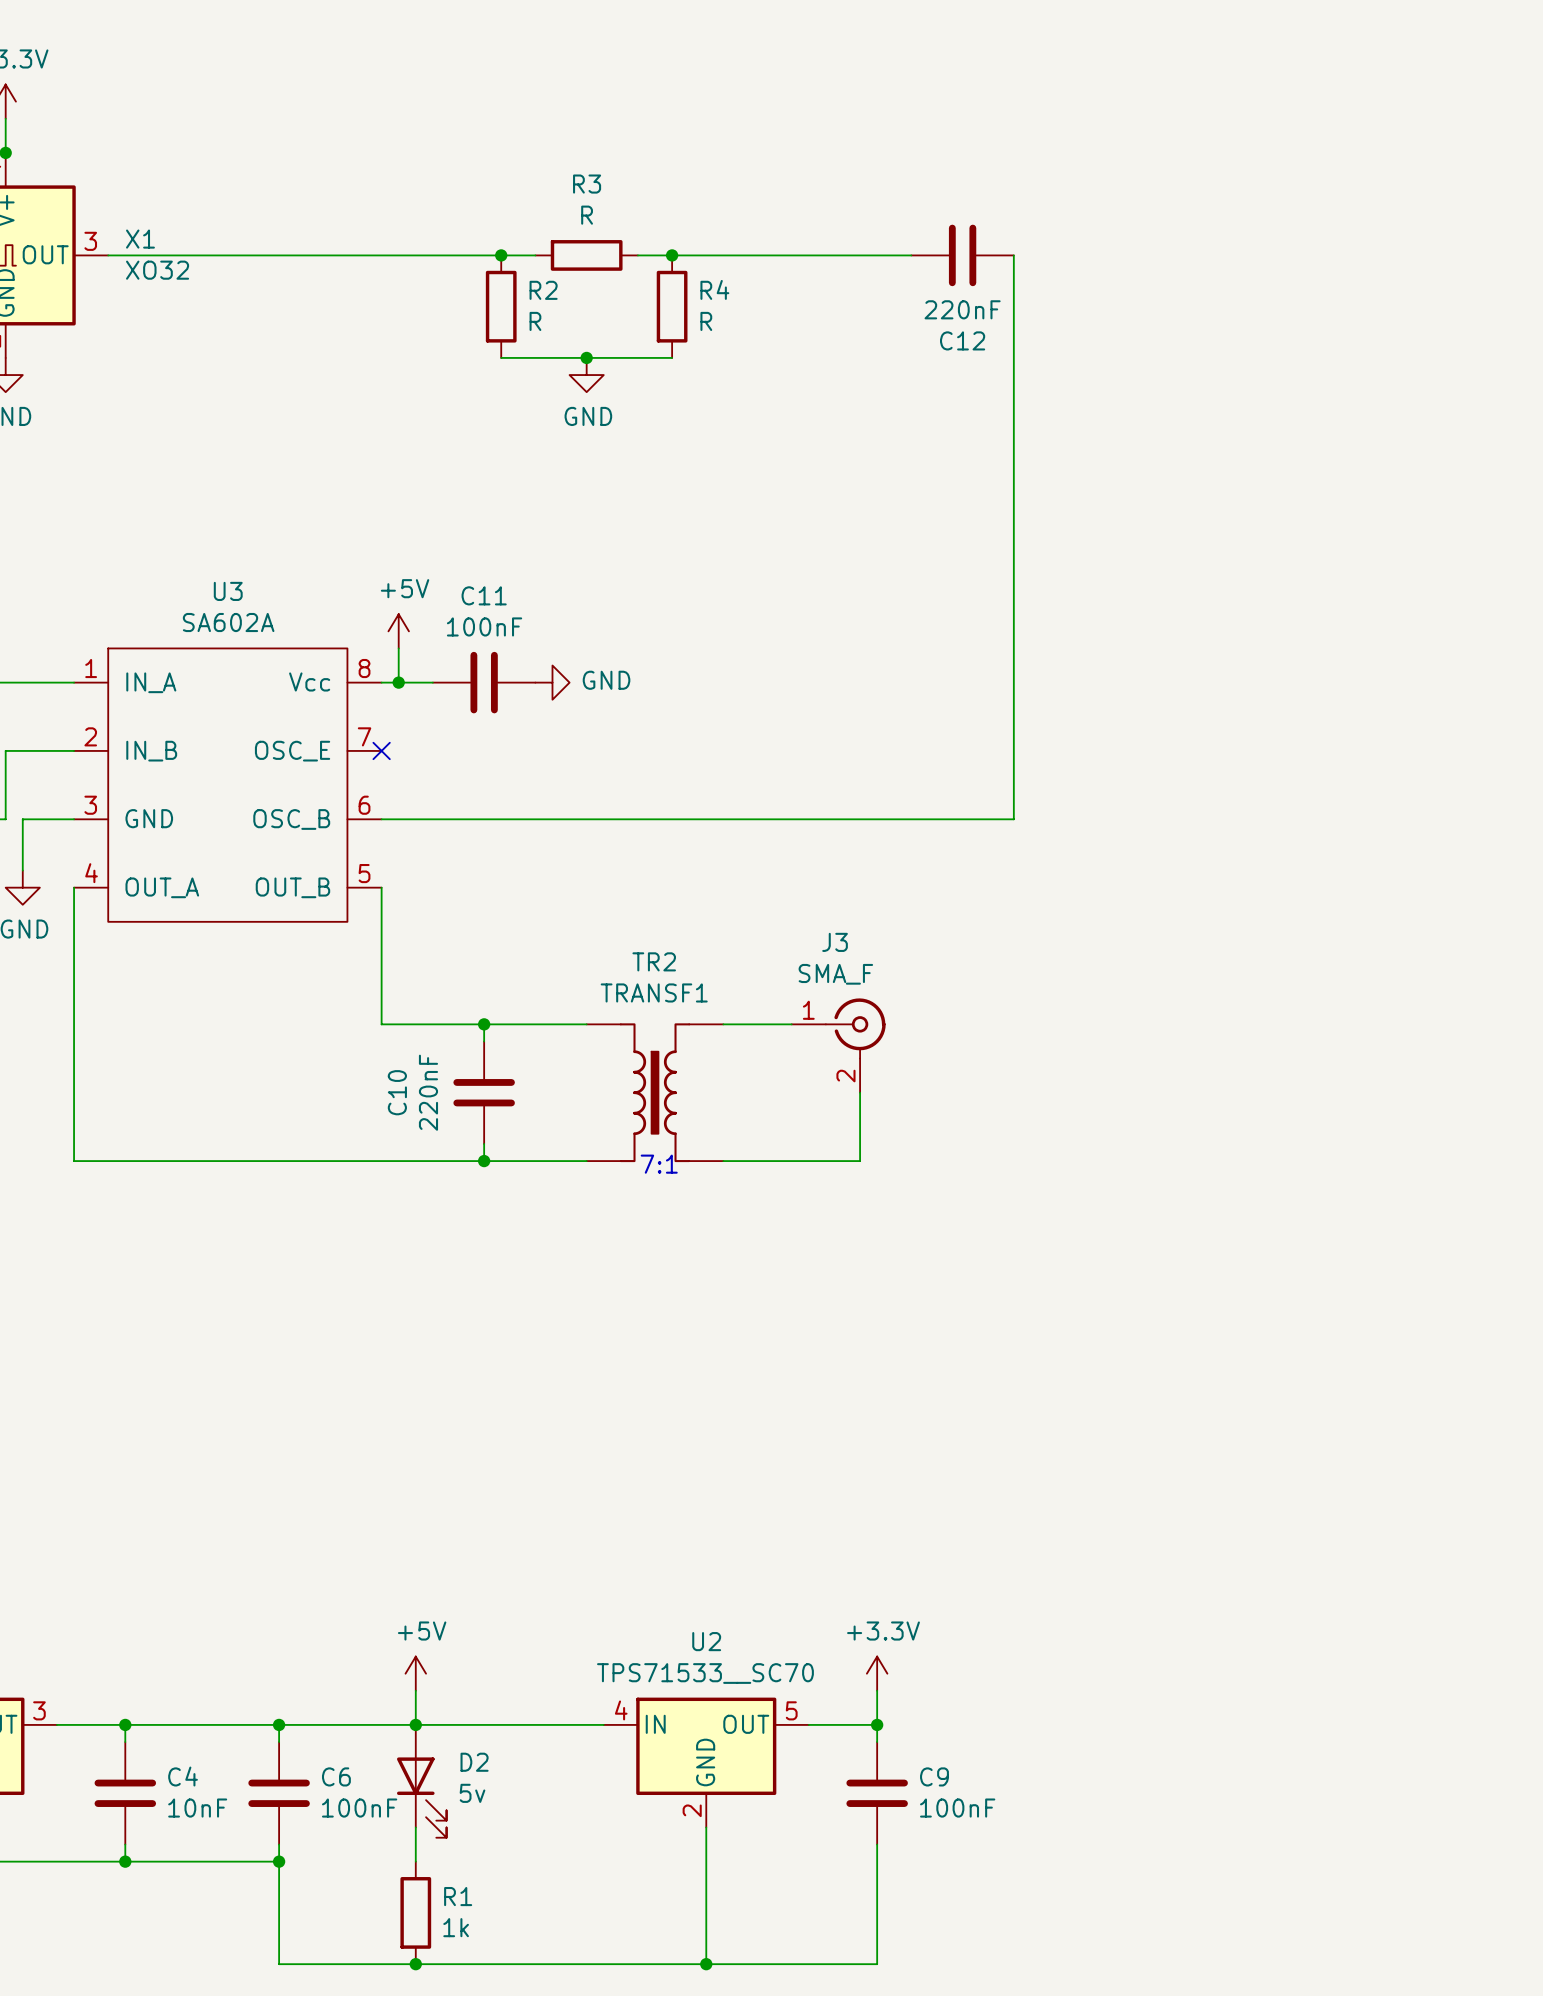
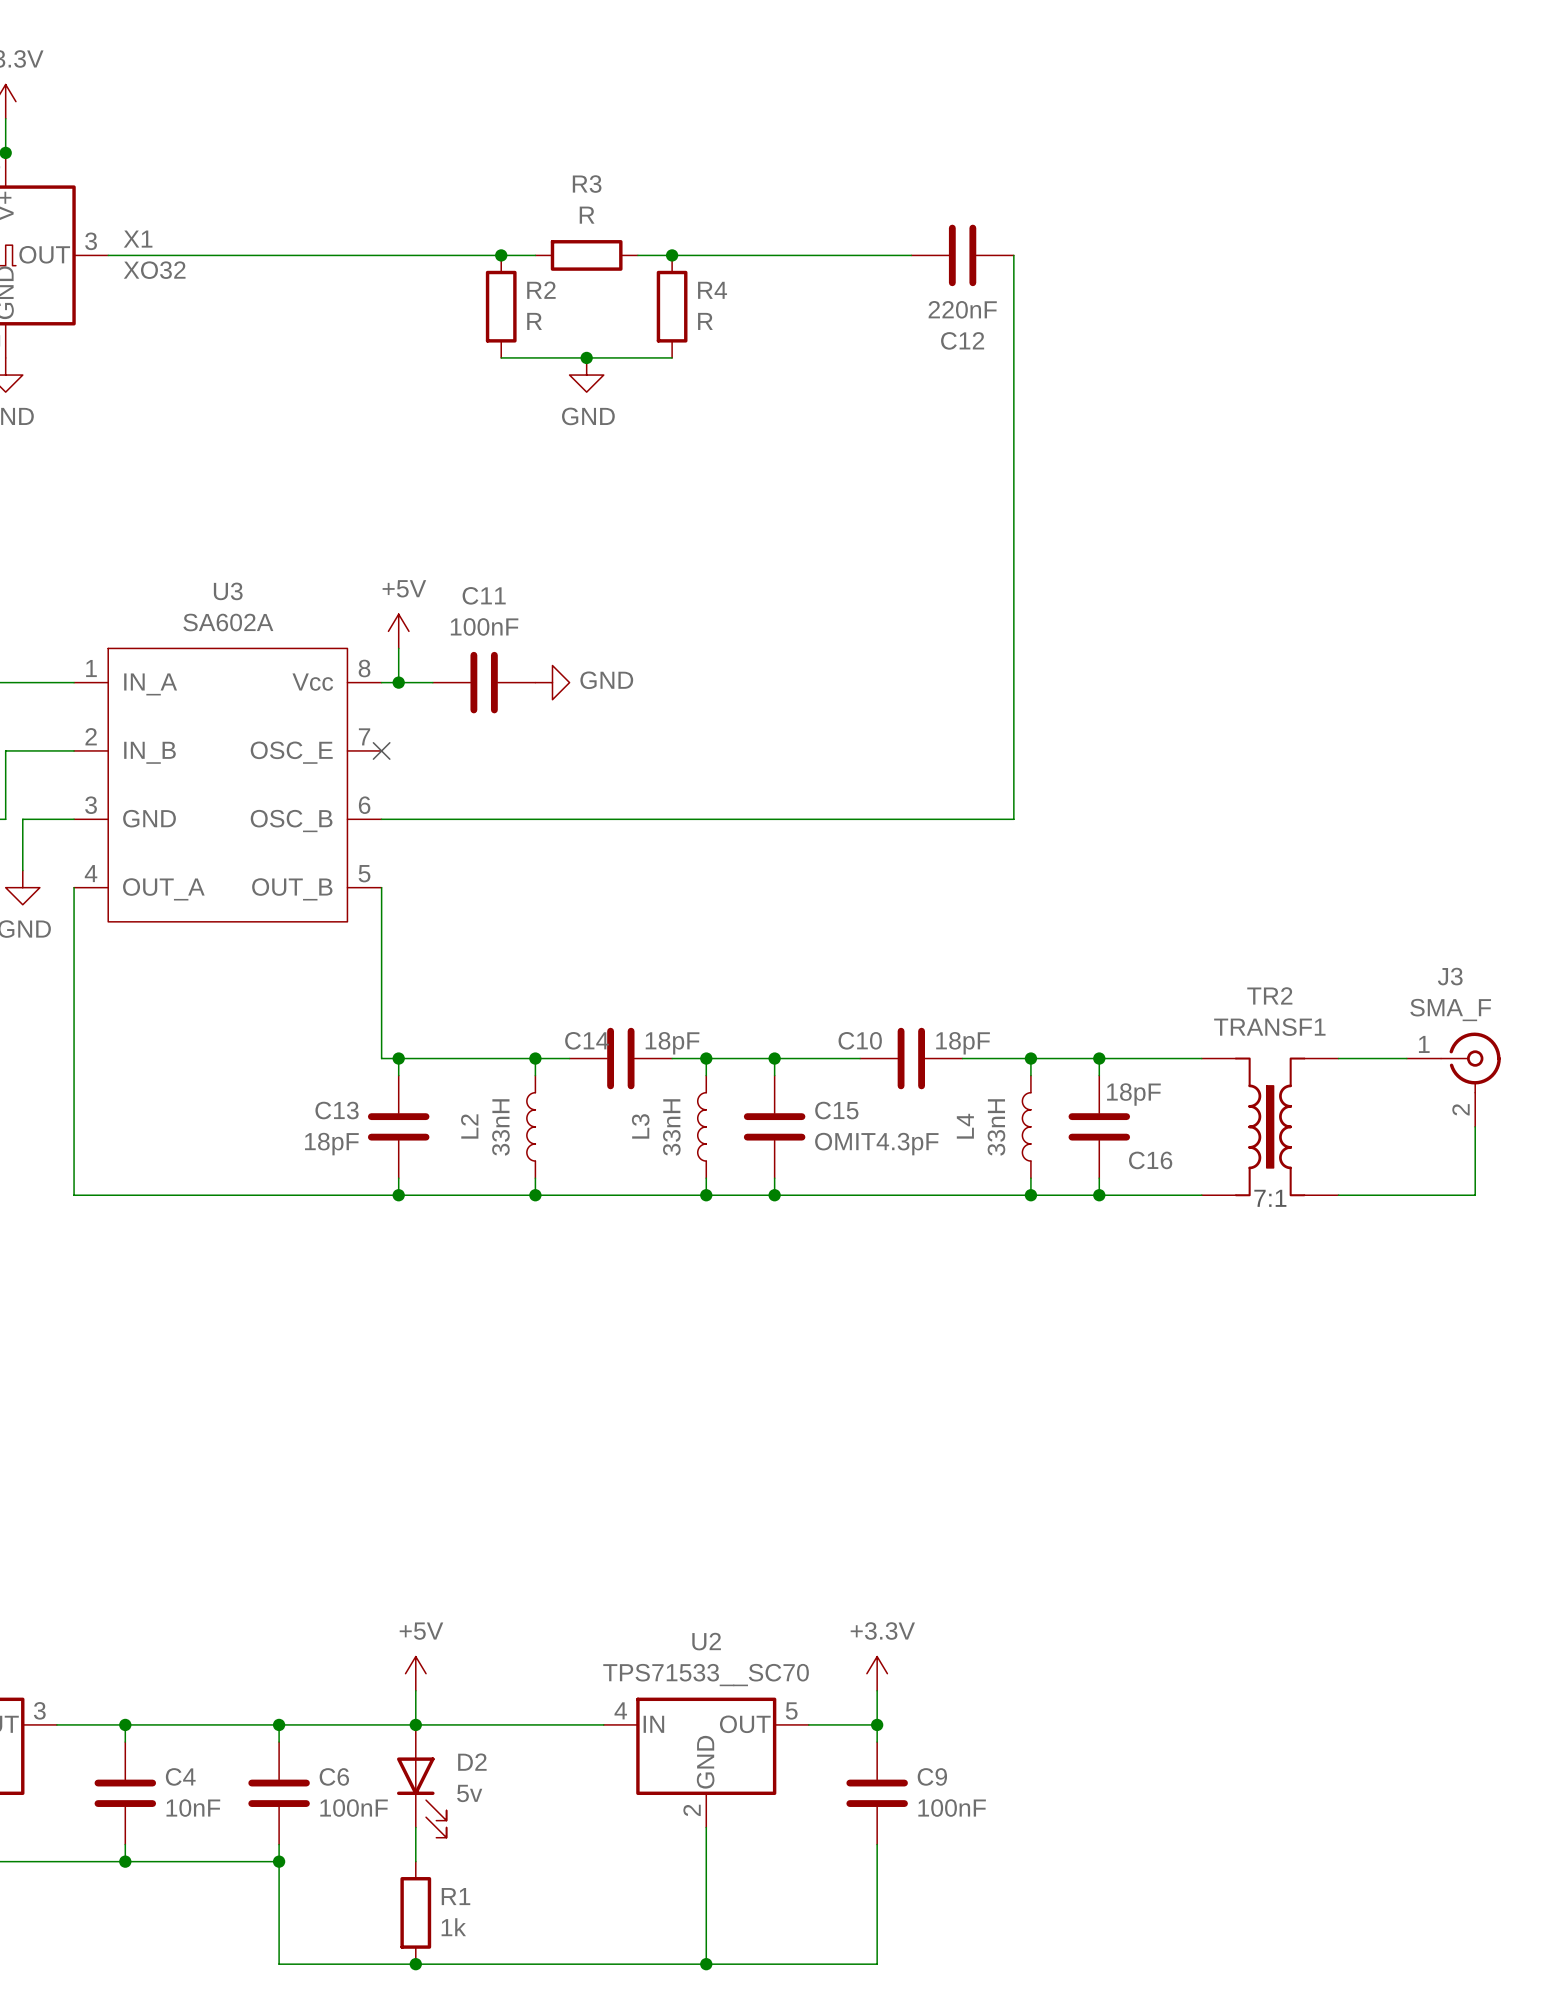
wire: (381, 1024) (586, 1024) -> (381, 1024) (381, 1058) (569, 1058)
wire: (484, 1024) (484, 1041) -> (535, 1058) (535, 1075)
junction: (484, 1024) -> none
wire: (723, 1024) (791, 1024) -> none
J3 position: (838, 1045) -> (1453, 1079)
wire: none -> (398, 1058) (398, 1075)
junction: none -> (398, 1058)
junction: none -> (535, 1058)
C14: none -> 18pF (620, 1058)
wire: none -> (672, 1058) (860, 1058)
wire: none -> (706, 1058) (706, 1075)
junction: none -> (706, 1058)
wire: none -> (774, 1058) (774, 1075)
junction: none -> (774, 1058)
wire: none -> (962, 1058) (1201, 1058)
wire: none -> (1030, 1058) (1030, 1075)
junction: none -> (1030, 1058)
wire: none -> (1099, 1058) (1099, 1075)
junction: none -> (1099, 1058)
wire: none -> (1338, 1058) (1406, 1058)
C10 name position: C10 (397, 1092) -> C10 (860, 1040)
C10 value: 220nF (428, 1092) -> 18pF (963, 1043)
C10 rotation: 0° (484, 1092) -> 90° clockwise (911, 1058)
C10 position: (484, 1092) -> (911, 1058)
TR2 position: (655, 1092) -> (1270, 1126)
wire: (860, 1092) (860, 1161) (723, 1161) -> none
C13: none -> 18pF (398, 1126)
L2: none -> 33nH (531, 1126)
L3: none -> 33nH (702, 1126)
C15: none -> OMIT4.3pF (774, 1126)
L4: none -> 33nH (1026, 1126)
C16: none -> 18pF (1099, 1126)
wire: none -> (1475, 1126) (1475, 1195) (1338, 1195)
wire: (484, 1143) (484, 1161) -> (535, 1178) (535, 1195)
wire: (74, 1161) (586, 1161) -> (74, 1161) (74, 1195) (1201, 1195)
junction: (484, 1161) -> none
text: 7:1 (659, 1164) -> none
wire: none -> (398, 1178) (398, 1195)
wire: none -> (706, 1178) (706, 1195)
wire: none -> (774, 1178) (774, 1195)
wire: none -> (1030, 1178) (1030, 1195)
wire: none -> (1099, 1178) (1099, 1195)
junction: none -> (398, 1195)
junction: none -> (535, 1195)
junction: none -> (706, 1195)
junction: none -> (774, 1195)
junction: none -> (1030, 1195)
junction: none -> (1099, 1195)
text: none -> 7:1 (1270, 1198)

